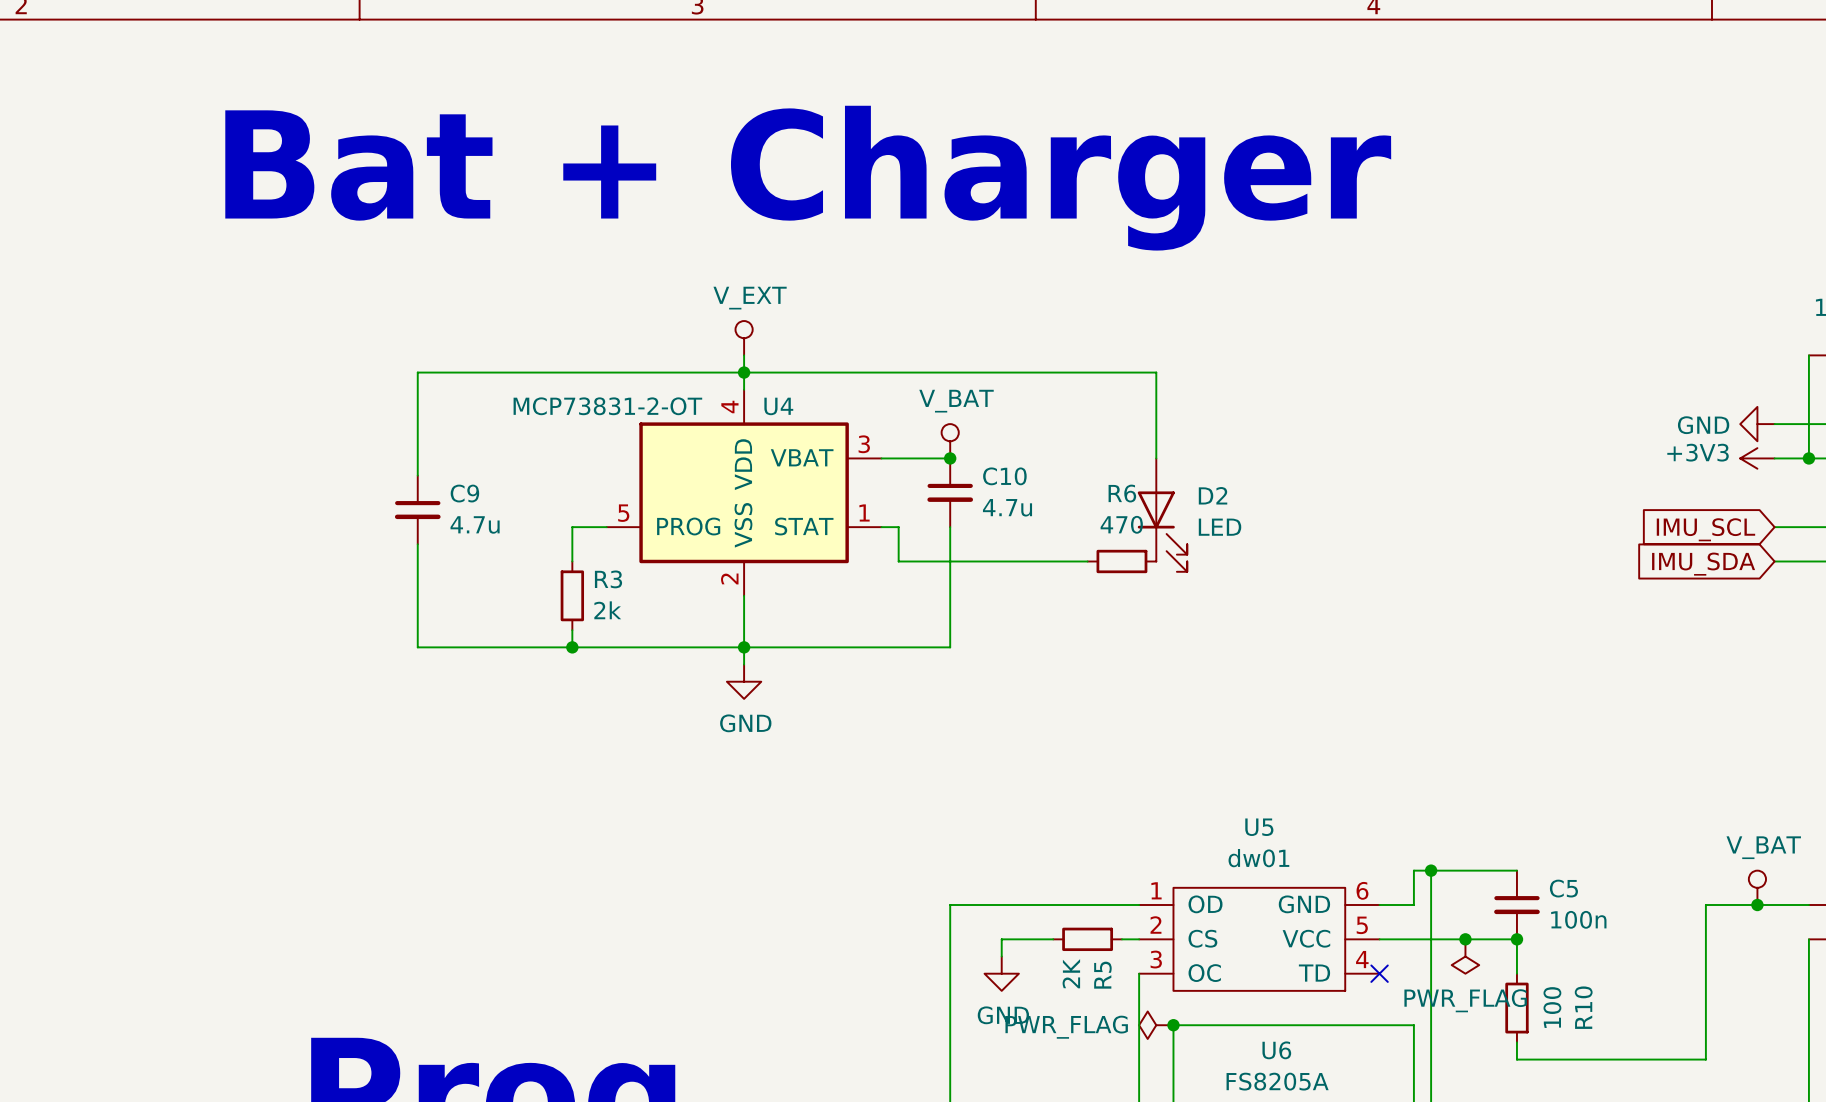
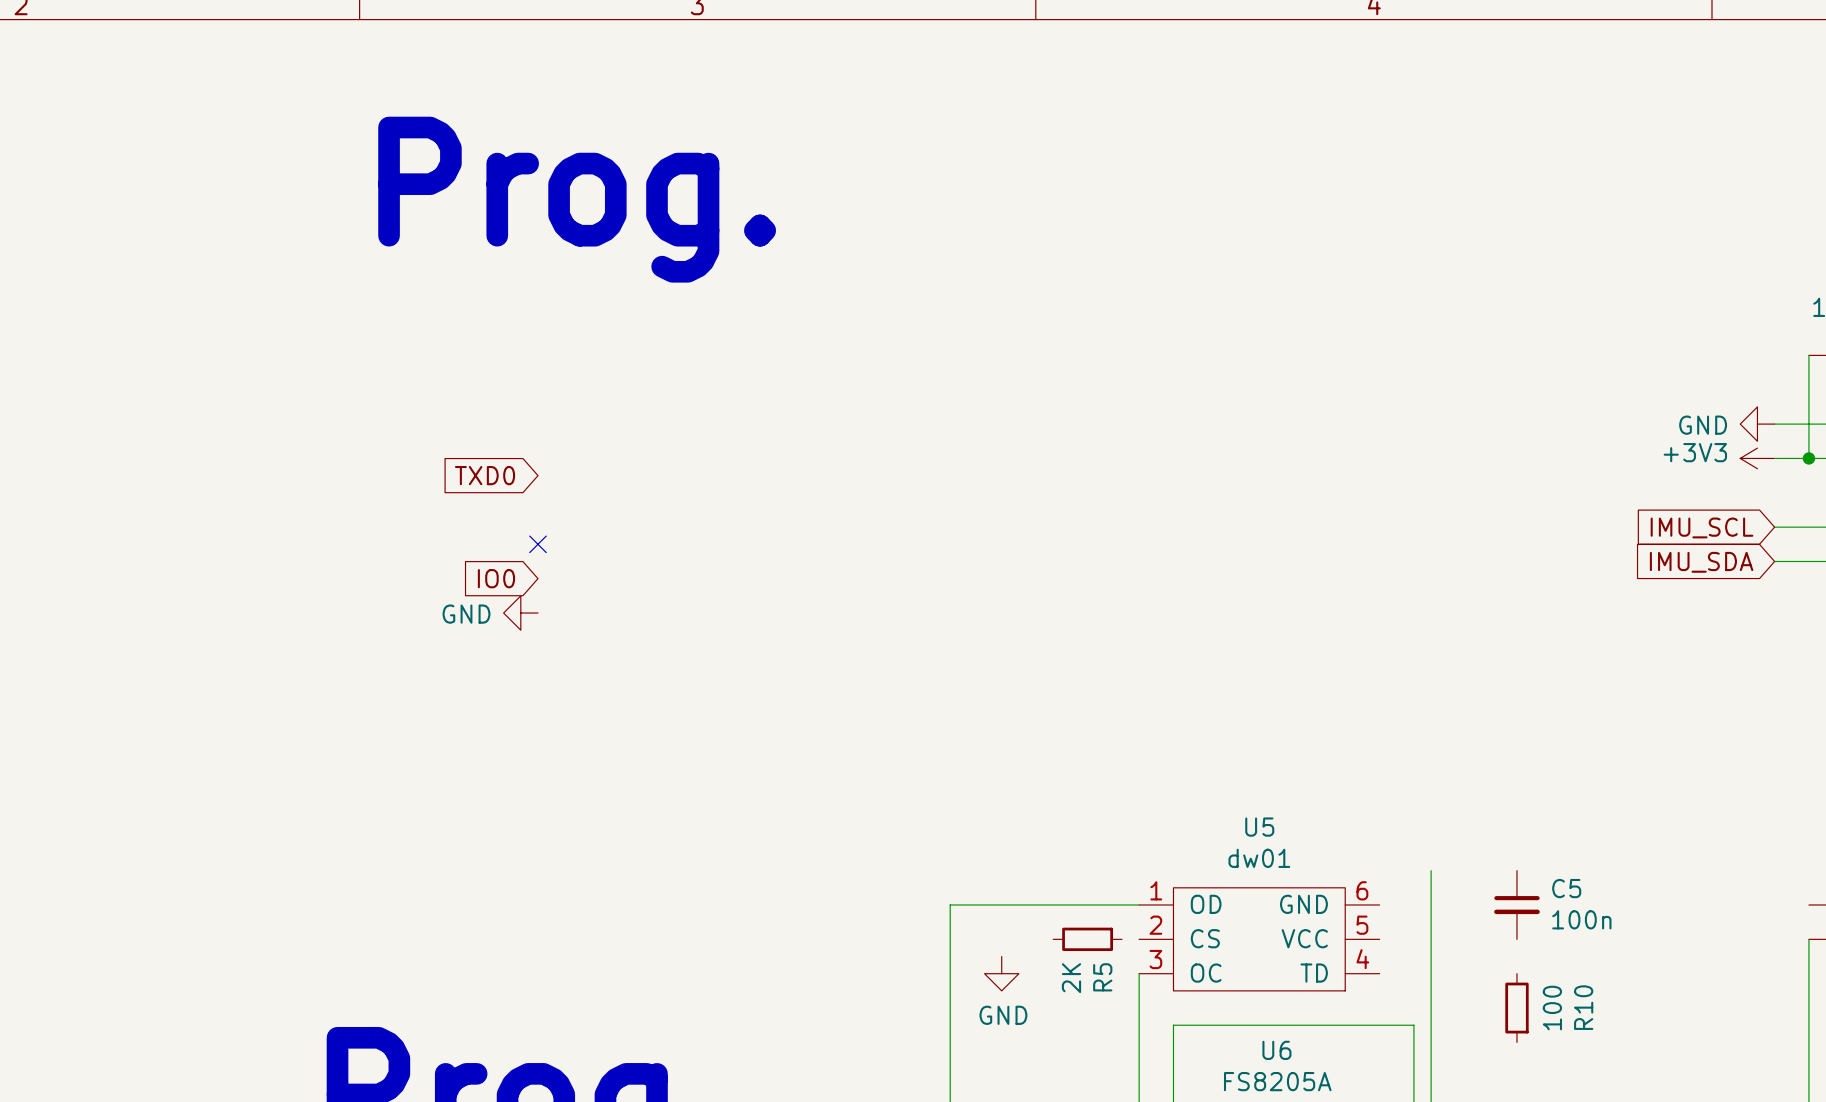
text: Bat + Charger (808, 178) -> none
text: none -> Prog. (577, 199)
power symbol: V_EXT (744, 338) -> none
wire: (744, 355) (744, 389) -> none
junction: (744, 372) -> none
power symbol: V_BAT (950, 441) -> none
wire: (881, 458) (950, 458) -> none
junction: (950, 458) -> none
wire: (1156, 458) (1156, 372) (417, 372) (417, 475) -> none
global label: none -> TXD0 (485, 475)
U4: MCP73831-2-OT (744, 492) -> none
C10: 4.7u (950, 492) -> none
C9: 4.7u (417, 509) -> none
D2: LED (1162, 515) -> none
wire: (606, 527) (572, 527) (572, 561) -> none
wire: (881, 527) (898, 527) (898, 561) (1087, 561) -> none
wire: (950, 527) (950, 647) (417, 647) (417, 544) -> none
no-connect mark: none -> (537, 544)
R6: 470 (1121, 561) -> none
global label: none -> IO0 (496, 578)
R3: 2k (572, 595) -> none
wire: (744, 595) (744, 664) -> none
wire: (572, 630) (572, 647) -> none
junction: (572, 647) -> none
junction: (744, 647) -> none
power symbol rotation: 0° (744, 681) -> 90° clockwise (520, 613)
power symbol position: GND (744, 681) -> GND (520, 613)
junction: (1431, 870) -> none
wire: (1516, 870) (1413, 870) (1413, 904) (1379, 904) -> none
power symbol: V_BAT (1757, 887) -> none
junction: (1757, 904) -> none
wire: (1808, 904) (1705, 904) (1705, 1059) (1516, 1059) (1516, 1042) -> none
wire: (1053, 939) (1001, 939) (1001, 956) -> none
wire: (1121, 939) (1139, 939) -> none
wire: (1379, 939) (1516, 939) (1516, 973) -> none
junction: (1465, 939) -> none
junction: (1516, 939) -> none
power symbol: PWR_FLAG (1465, 956) -> none
no-connect mark: (1379, 973) -> none
power symbol: PWR_FLAG (1156, 1025) -> none
junction: (1173, 1025) -> none

